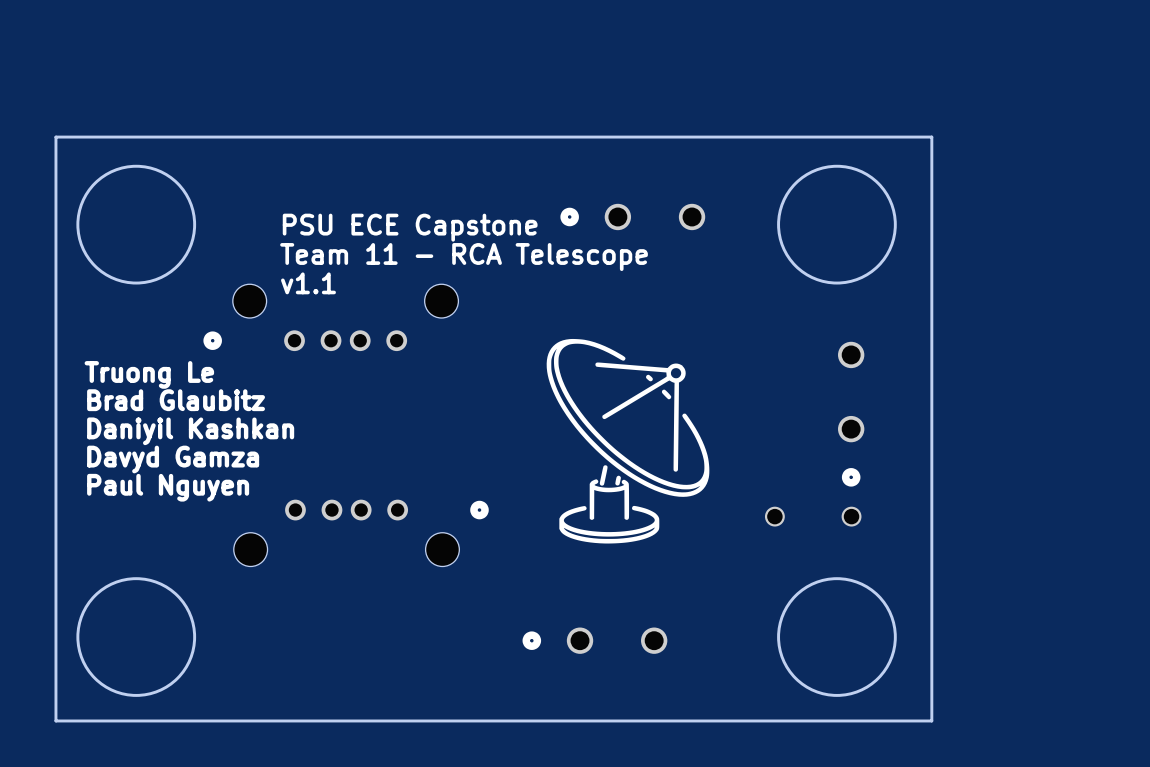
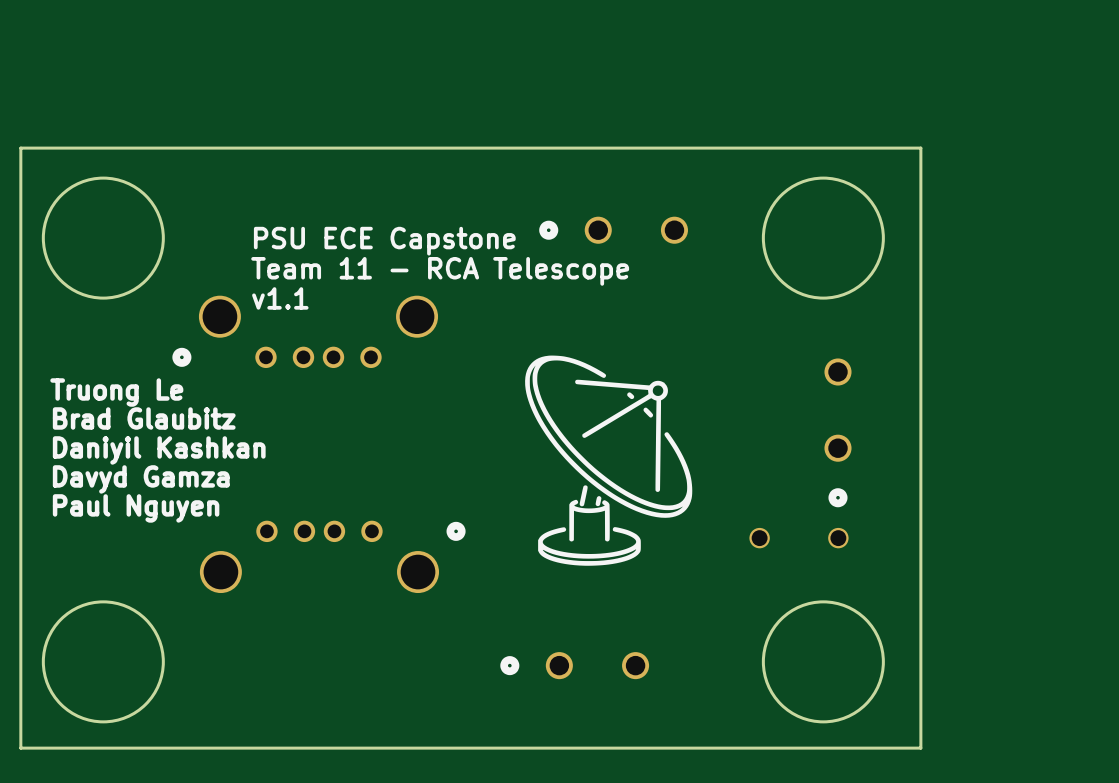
part footprint: [203, 284, 459, 352] -> [172, 295, 439, 369]
part footprint: [233, 499, 489, 567] -> [199, 520, 466, 594]

